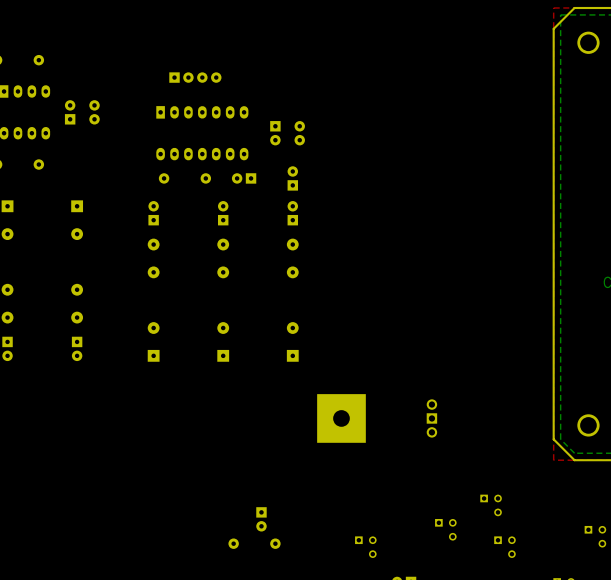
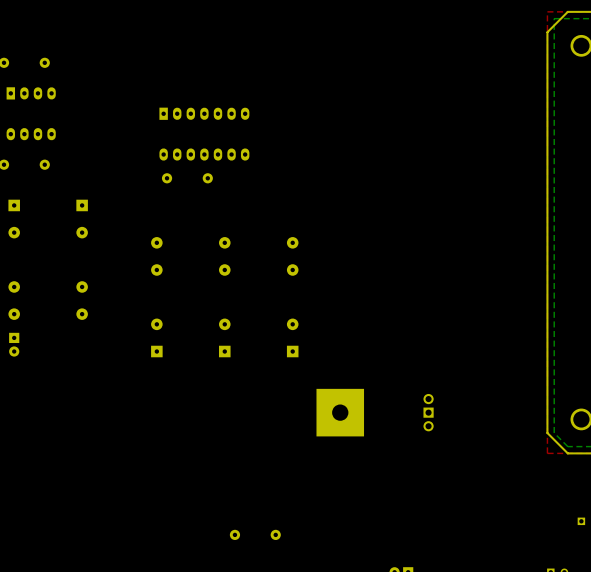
part: (195, 77) -> none
part: (70, 112) -> none
part: (94, 112) -> none
part: (275, 133) -> none
part: (299, 133) -> none
part: (244, 178) -> none
part: (292, 178) -> none
part: (153, 213) -> none
part: (223, 213) -> none
part: (292, 213) -> none
part: (77, 348) -> none
part: (491, 505) -> none
part: (261, 519) -> none
part: (445, 529) -> none
part: (365, 547) -> none
part: (504, 547) -> none

